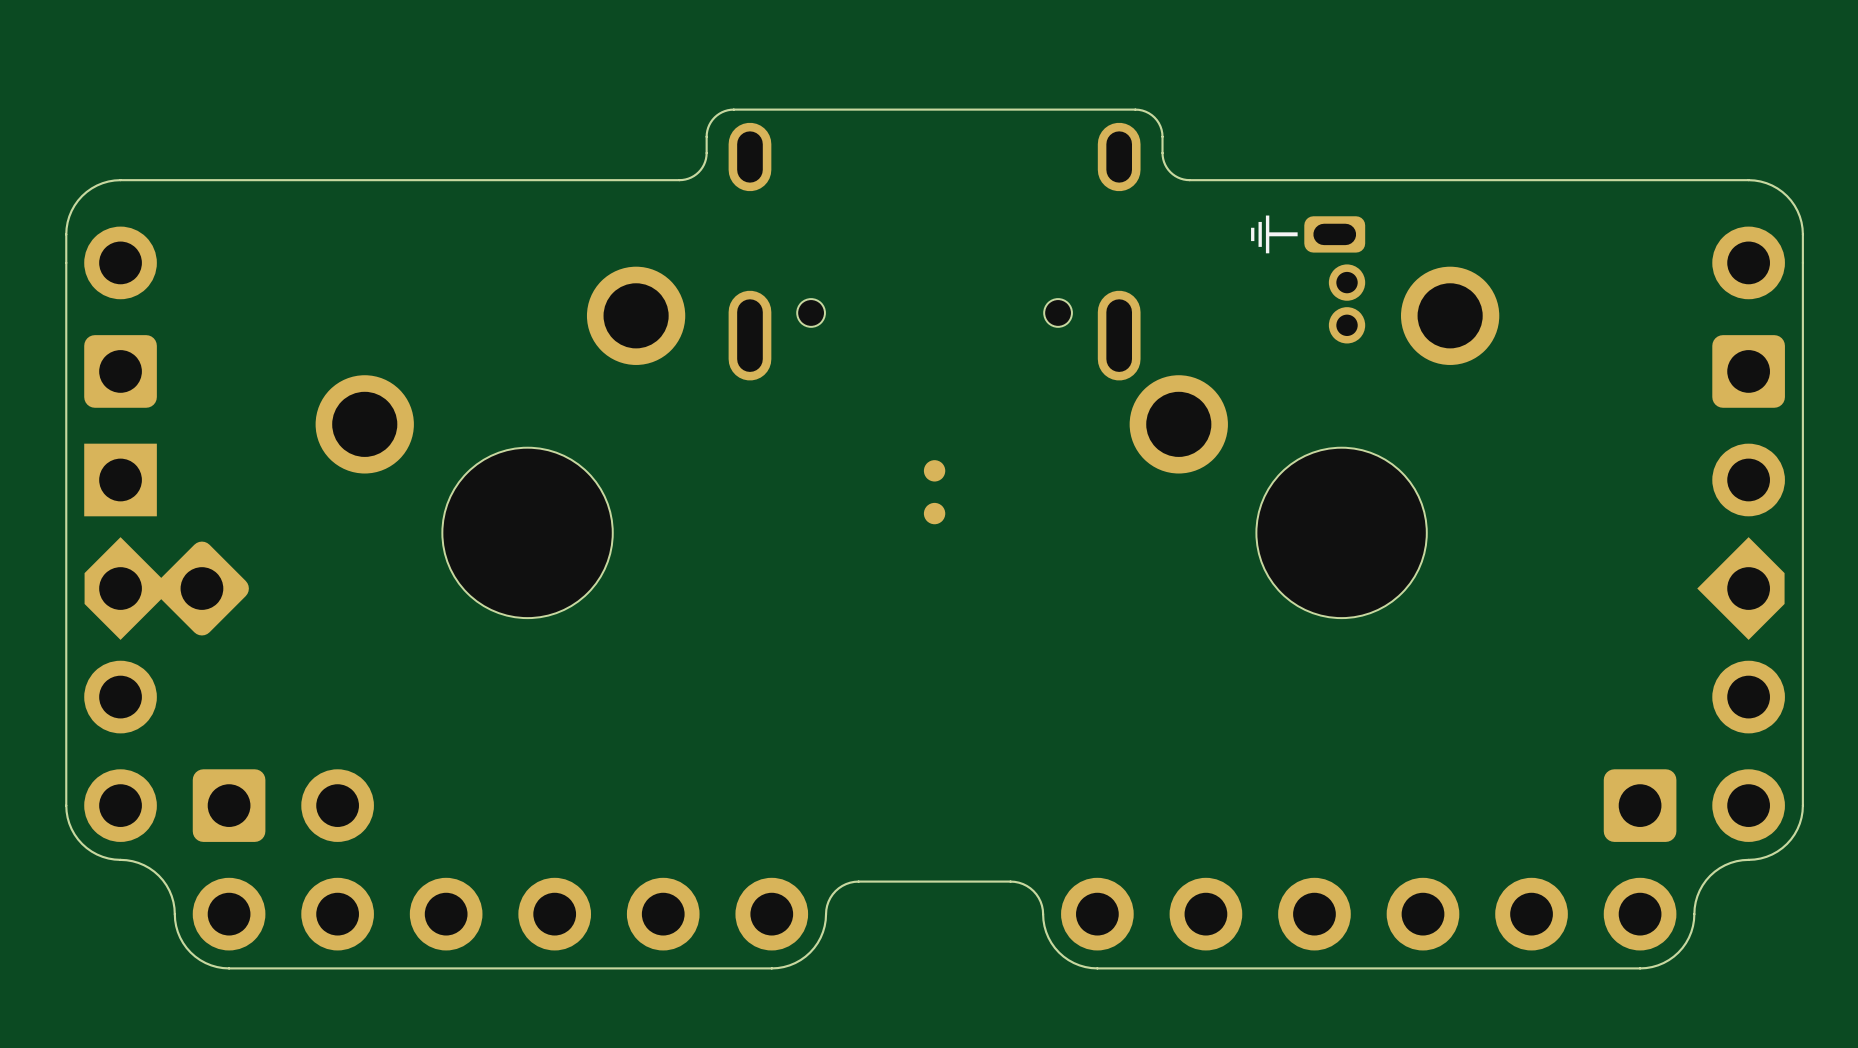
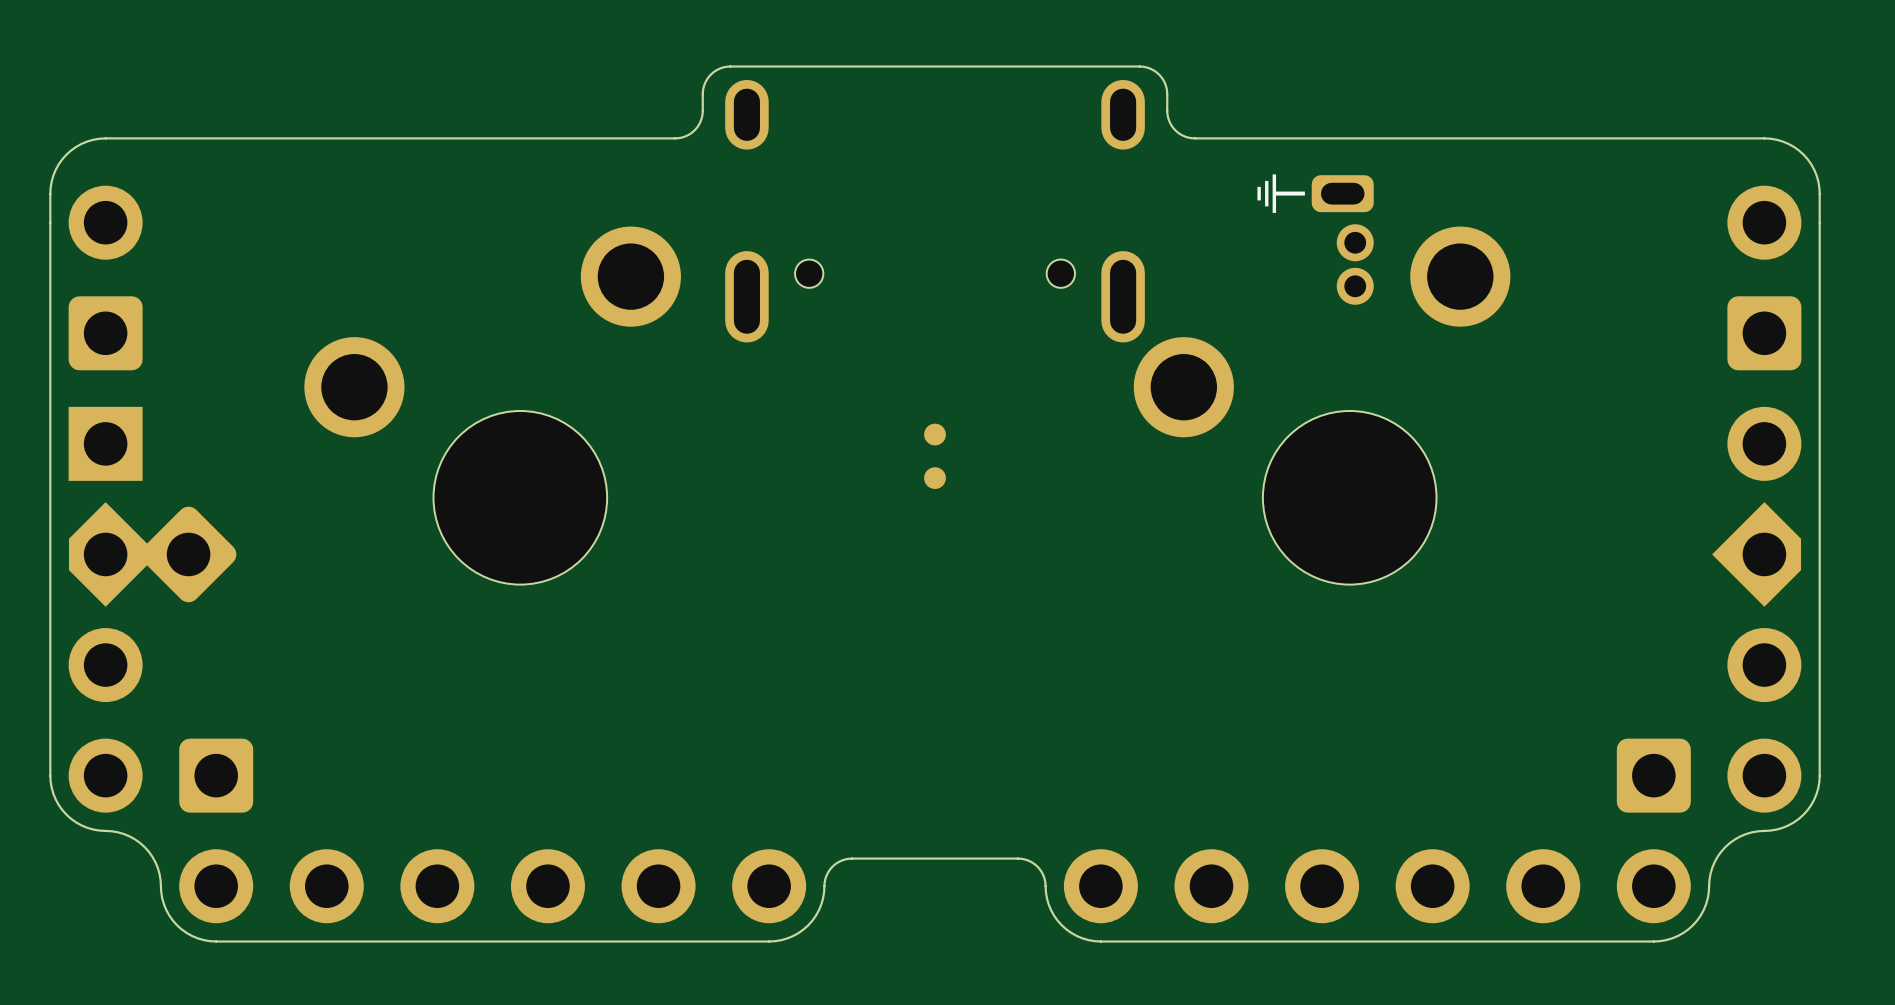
part footprint: [65, 226, 1804, 970] -> [49, 185, 1821, 943]

